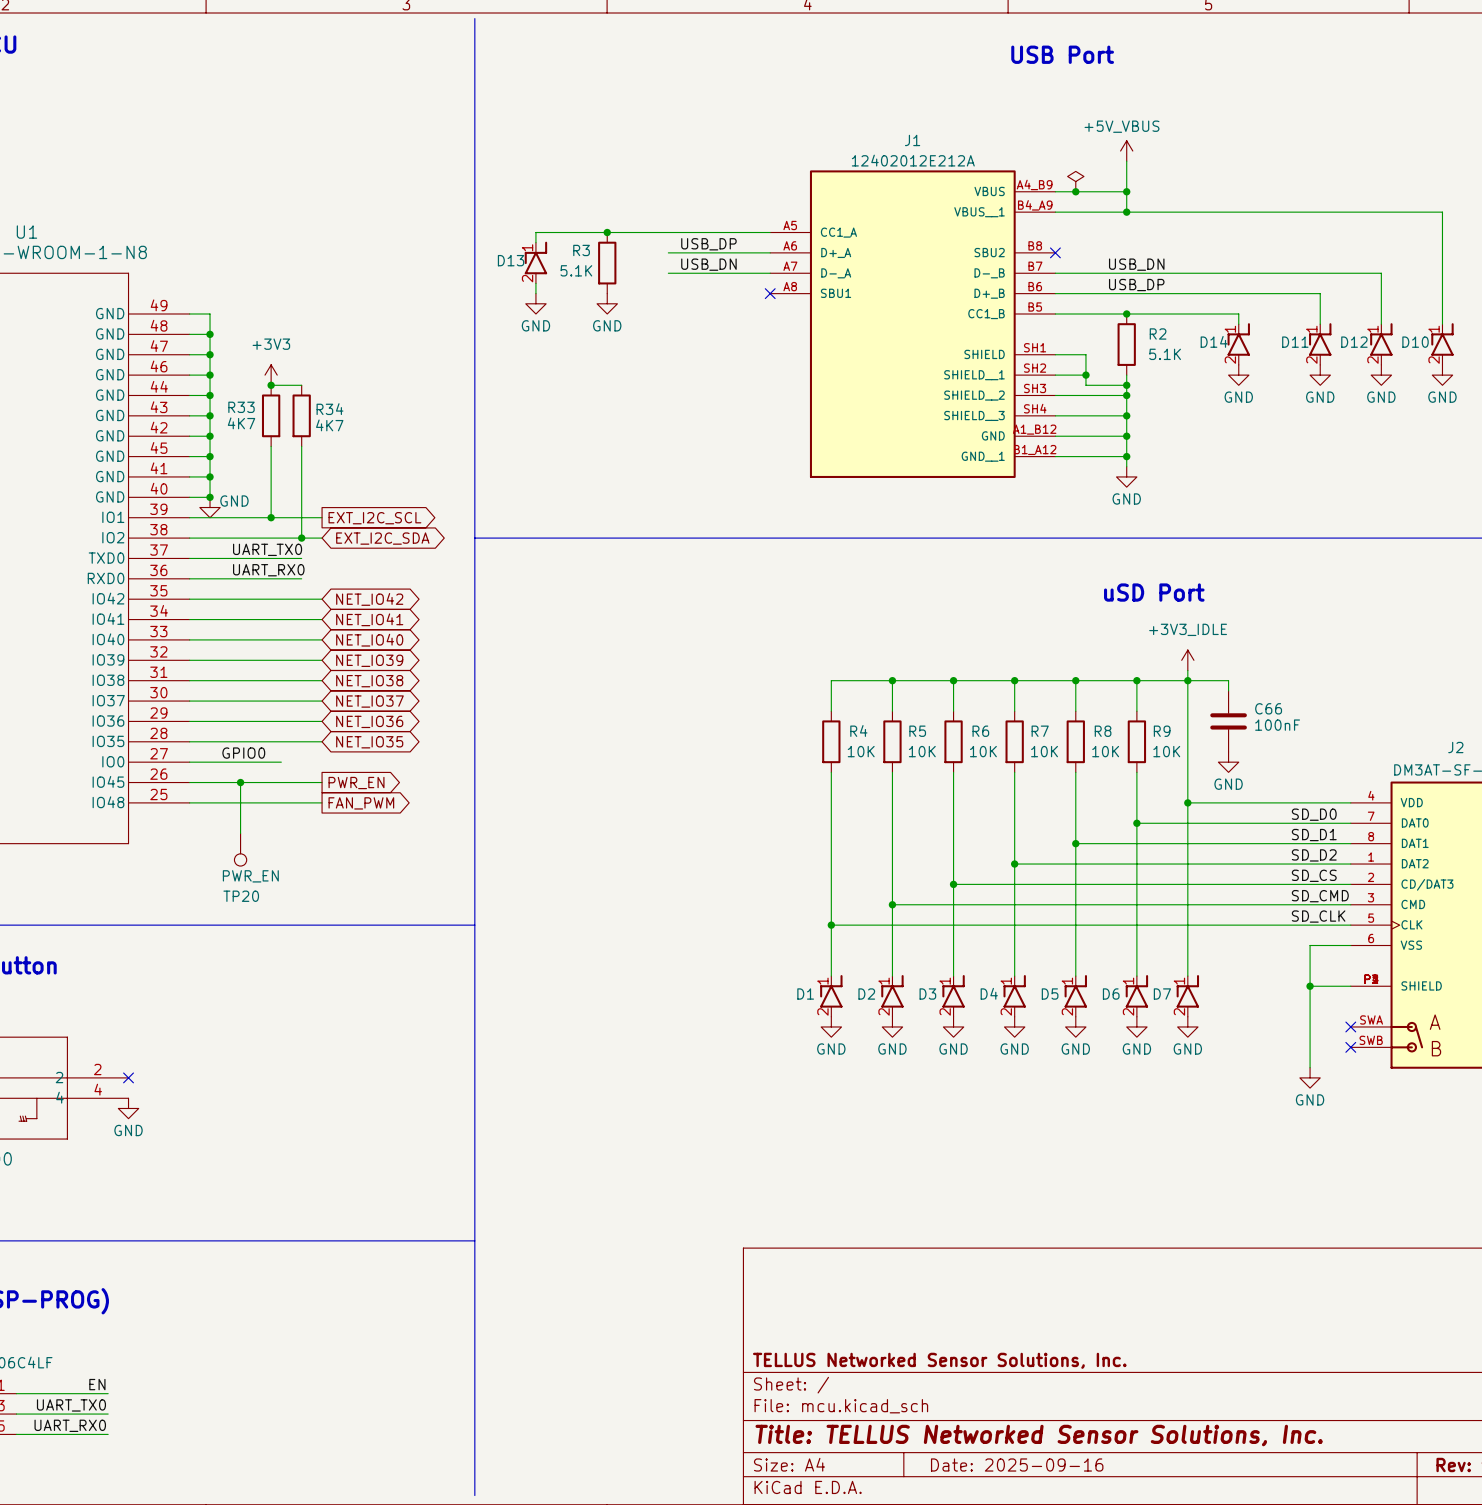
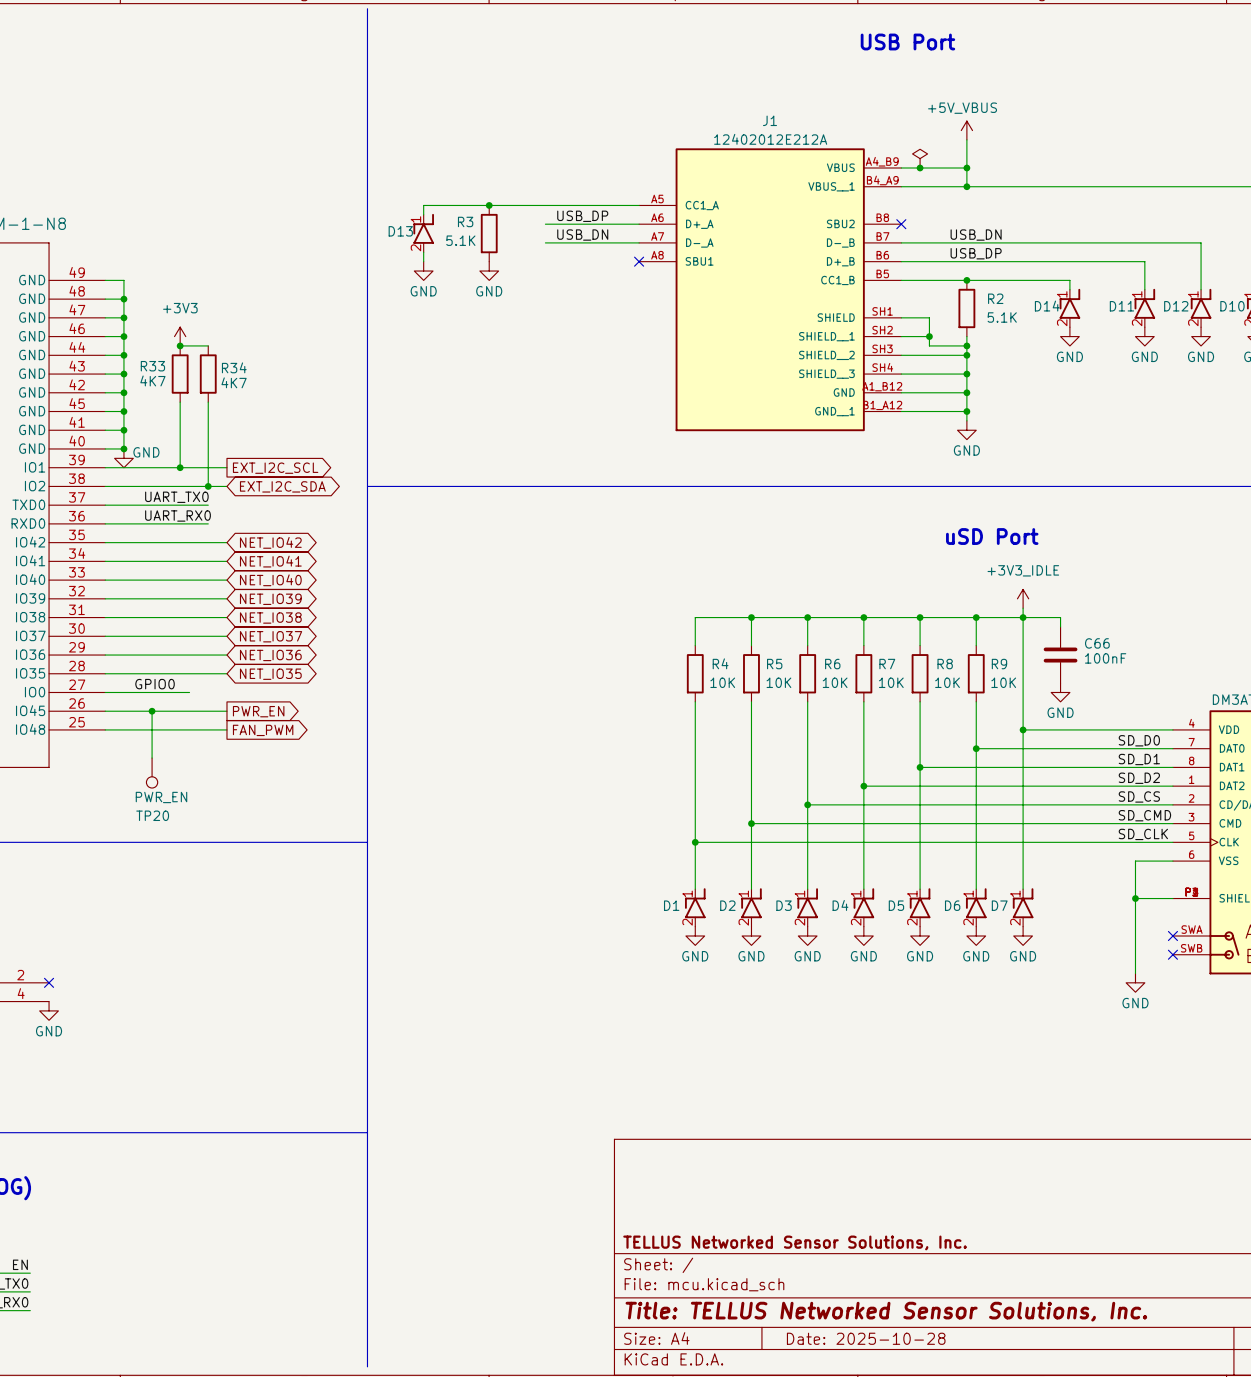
title block: Date: 2025-09-16 (1017, 1465) -> Date: 2025-10-28 (866, 1338)

